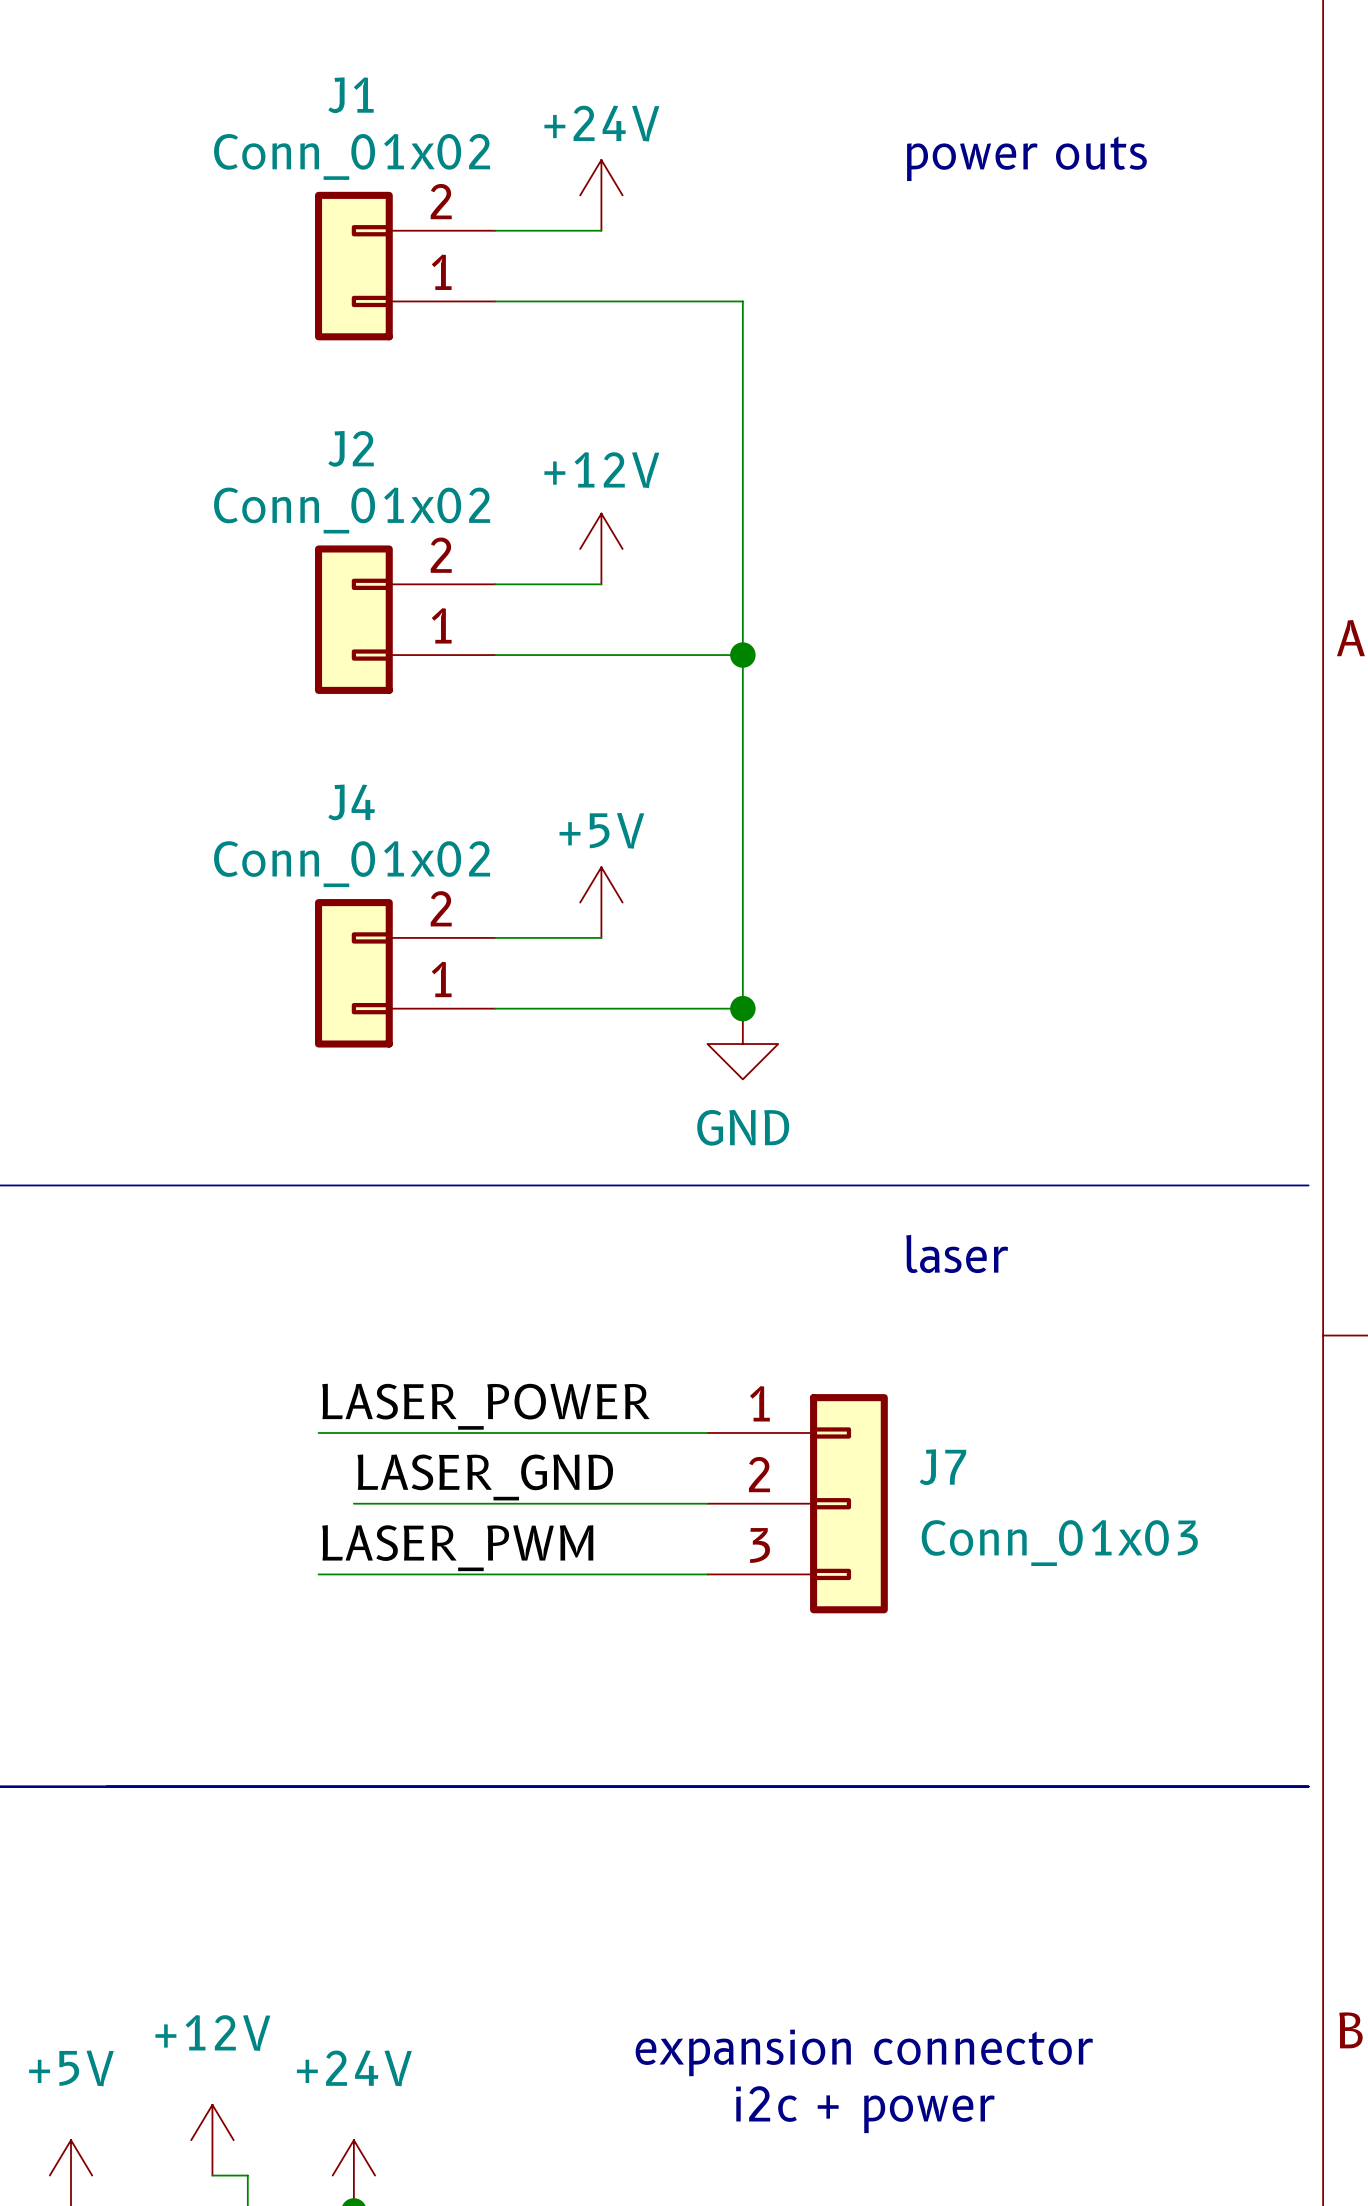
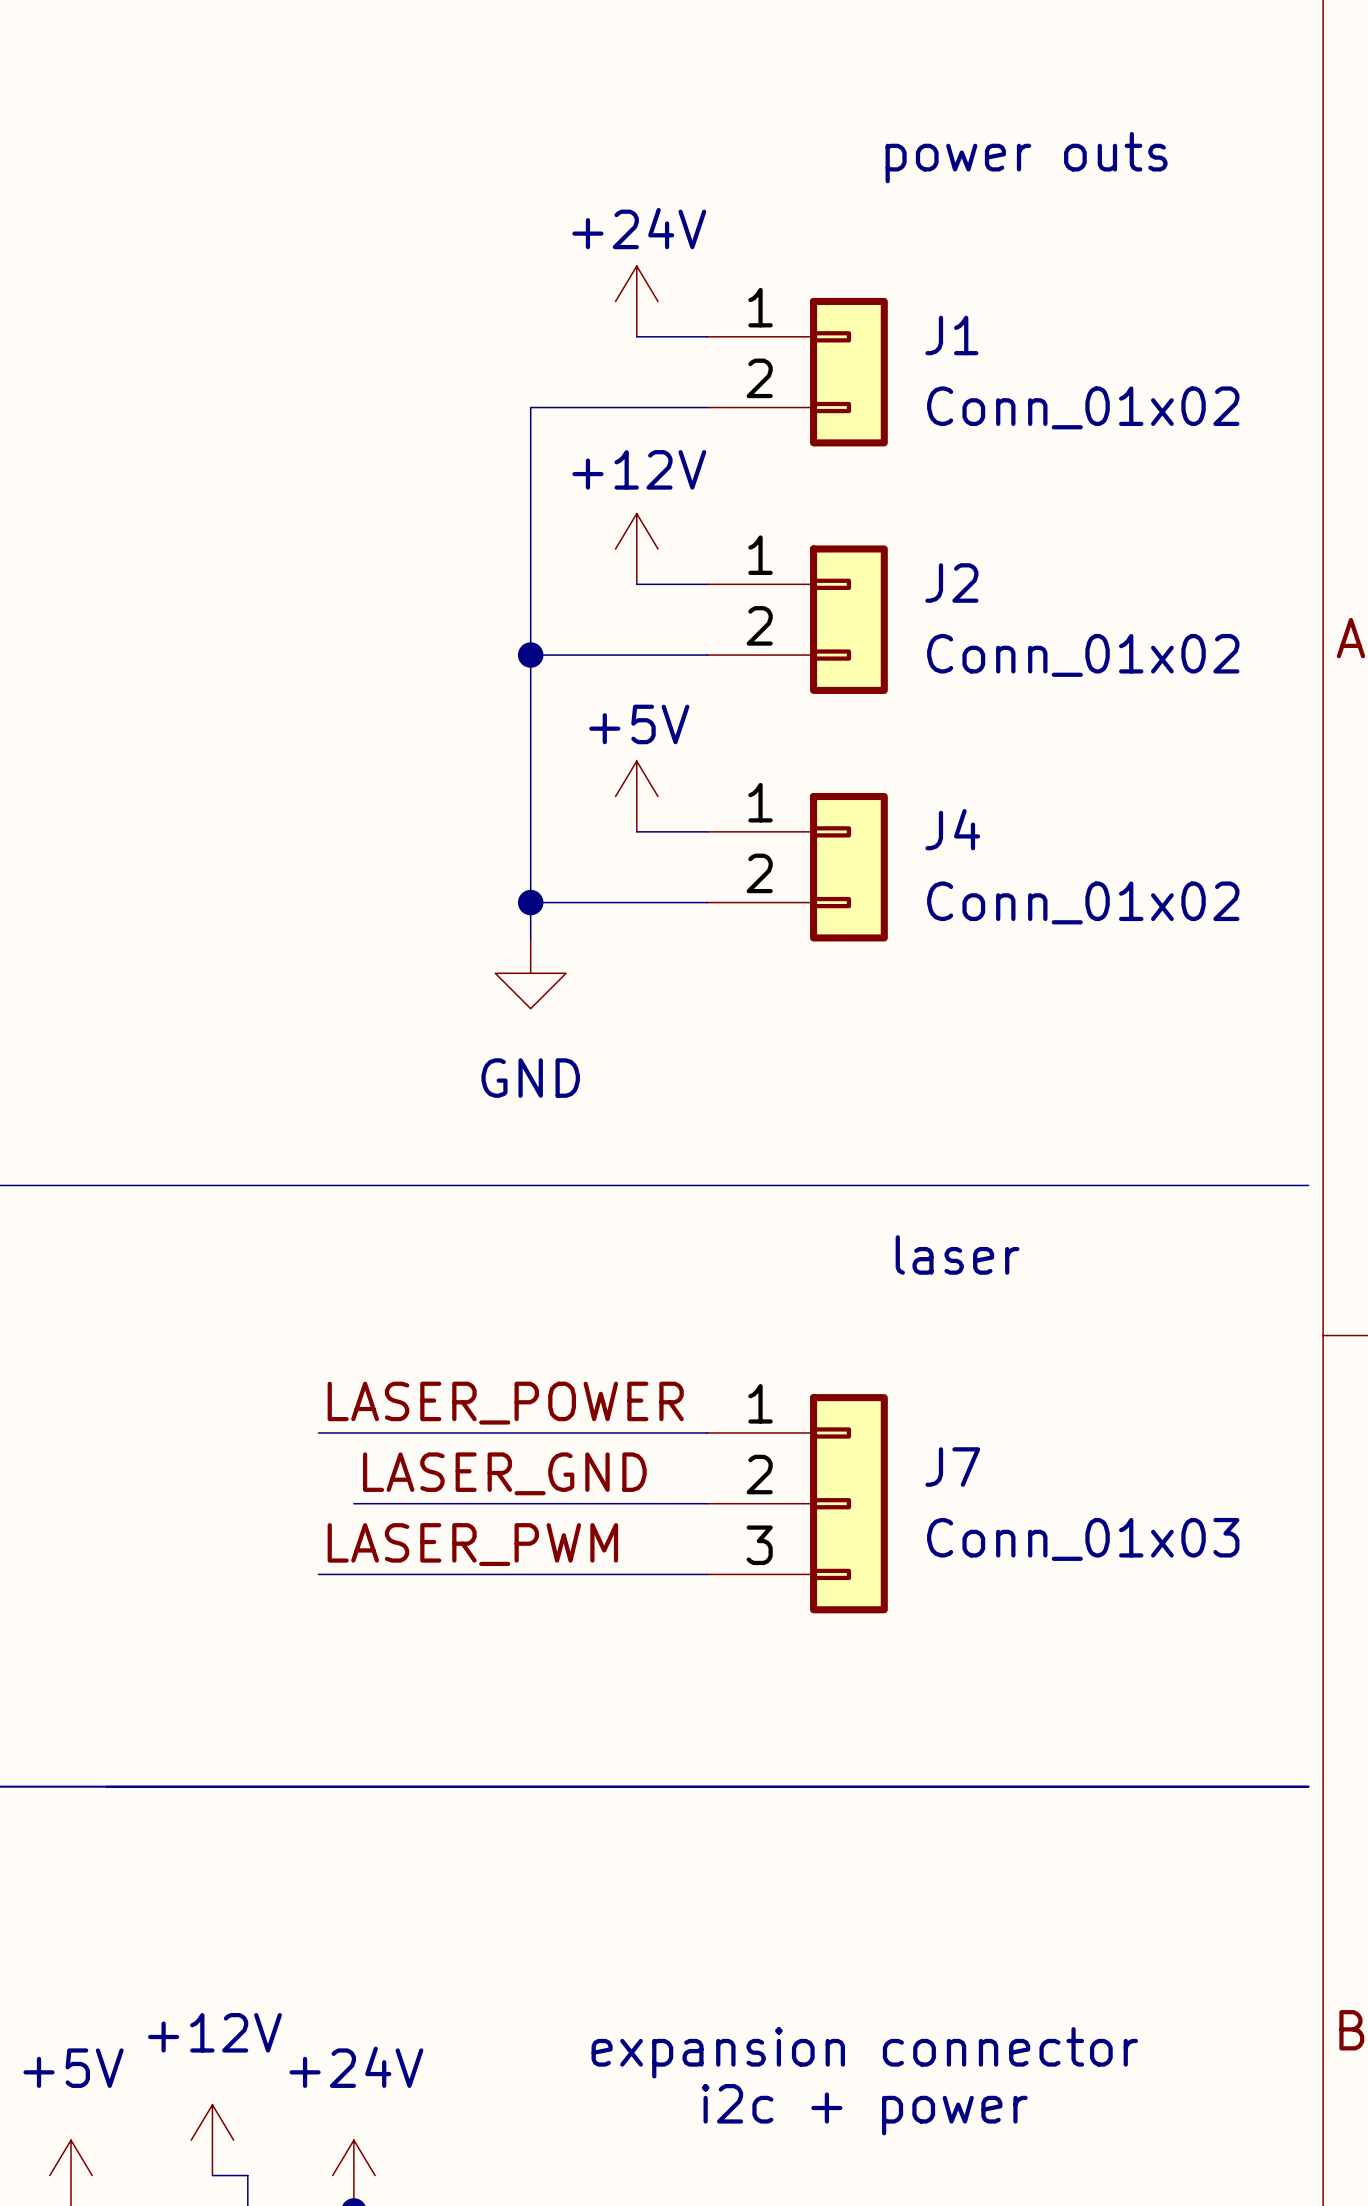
J1 name position: J1 (350, 95) -> J1 (951, 335)
J1 value position: Conn_01x02 (352, 156) -> Conn_01x02 (1083, 407)
power symbol position: +24V (601, 195) -> +24V (636, 301)
wire: (495, 230) (601, 230) -> none
J1 rotation: 0° (353, 266) -> 180° (848, 372)
J1 position: (405, 266) -> (797, 372)
wire: (495, 301) (742, 301) (742, 1008) (495, 1008) -> none
wire: none -> (636, 336) (707, 336)
wire: none -> (707, 407) (530, 407) (530, 937)
J2 name position: J2 (351, 448) -> J2 (951, 583)
J2 value position: Conn_01x02 (352, 510) -> Conn_01x02 (1083, 655)
power symbol position: +12V (601, 548) -> +12V (636, 548)
wire: (495, 584) (601, 584) -> none
wire: none -> (636, 584) (707, 584)
J2 rotation: 0° (353, 619) -> 180° (848, 619)
J2 position: (405, 619) -> (797, 619)
wire: (495, 655) (530, 655) -> none
junction: none -> (530, 655)
junction: (742, 655) -> none
J4 name position: J4 (351, 802) -> J4 (952, 829)
wire: none -> (636, 831) (707, 831)
J4 value position: Conn_01x02 (352, 864) -> Conn_01x02 (1083, 902)
wire: none -> (530, 902) (707, 902)
junction: none -> (530, 902)
power symbol position: +5V (601, 902) -> +5V (636, 796)
wire: (495, 937) (601, 937) -> none
J4 rotation: 0° (353, 973) -> 180° (848, 867)
J4 position: (405, 973) -> (797, 867)
junction: (742, 1008) -> none
power symbol position: GND (742, 1044) -> GND (530, 973)
power symbol text position: GND (743, 1127) -> GND (530, 1078)

